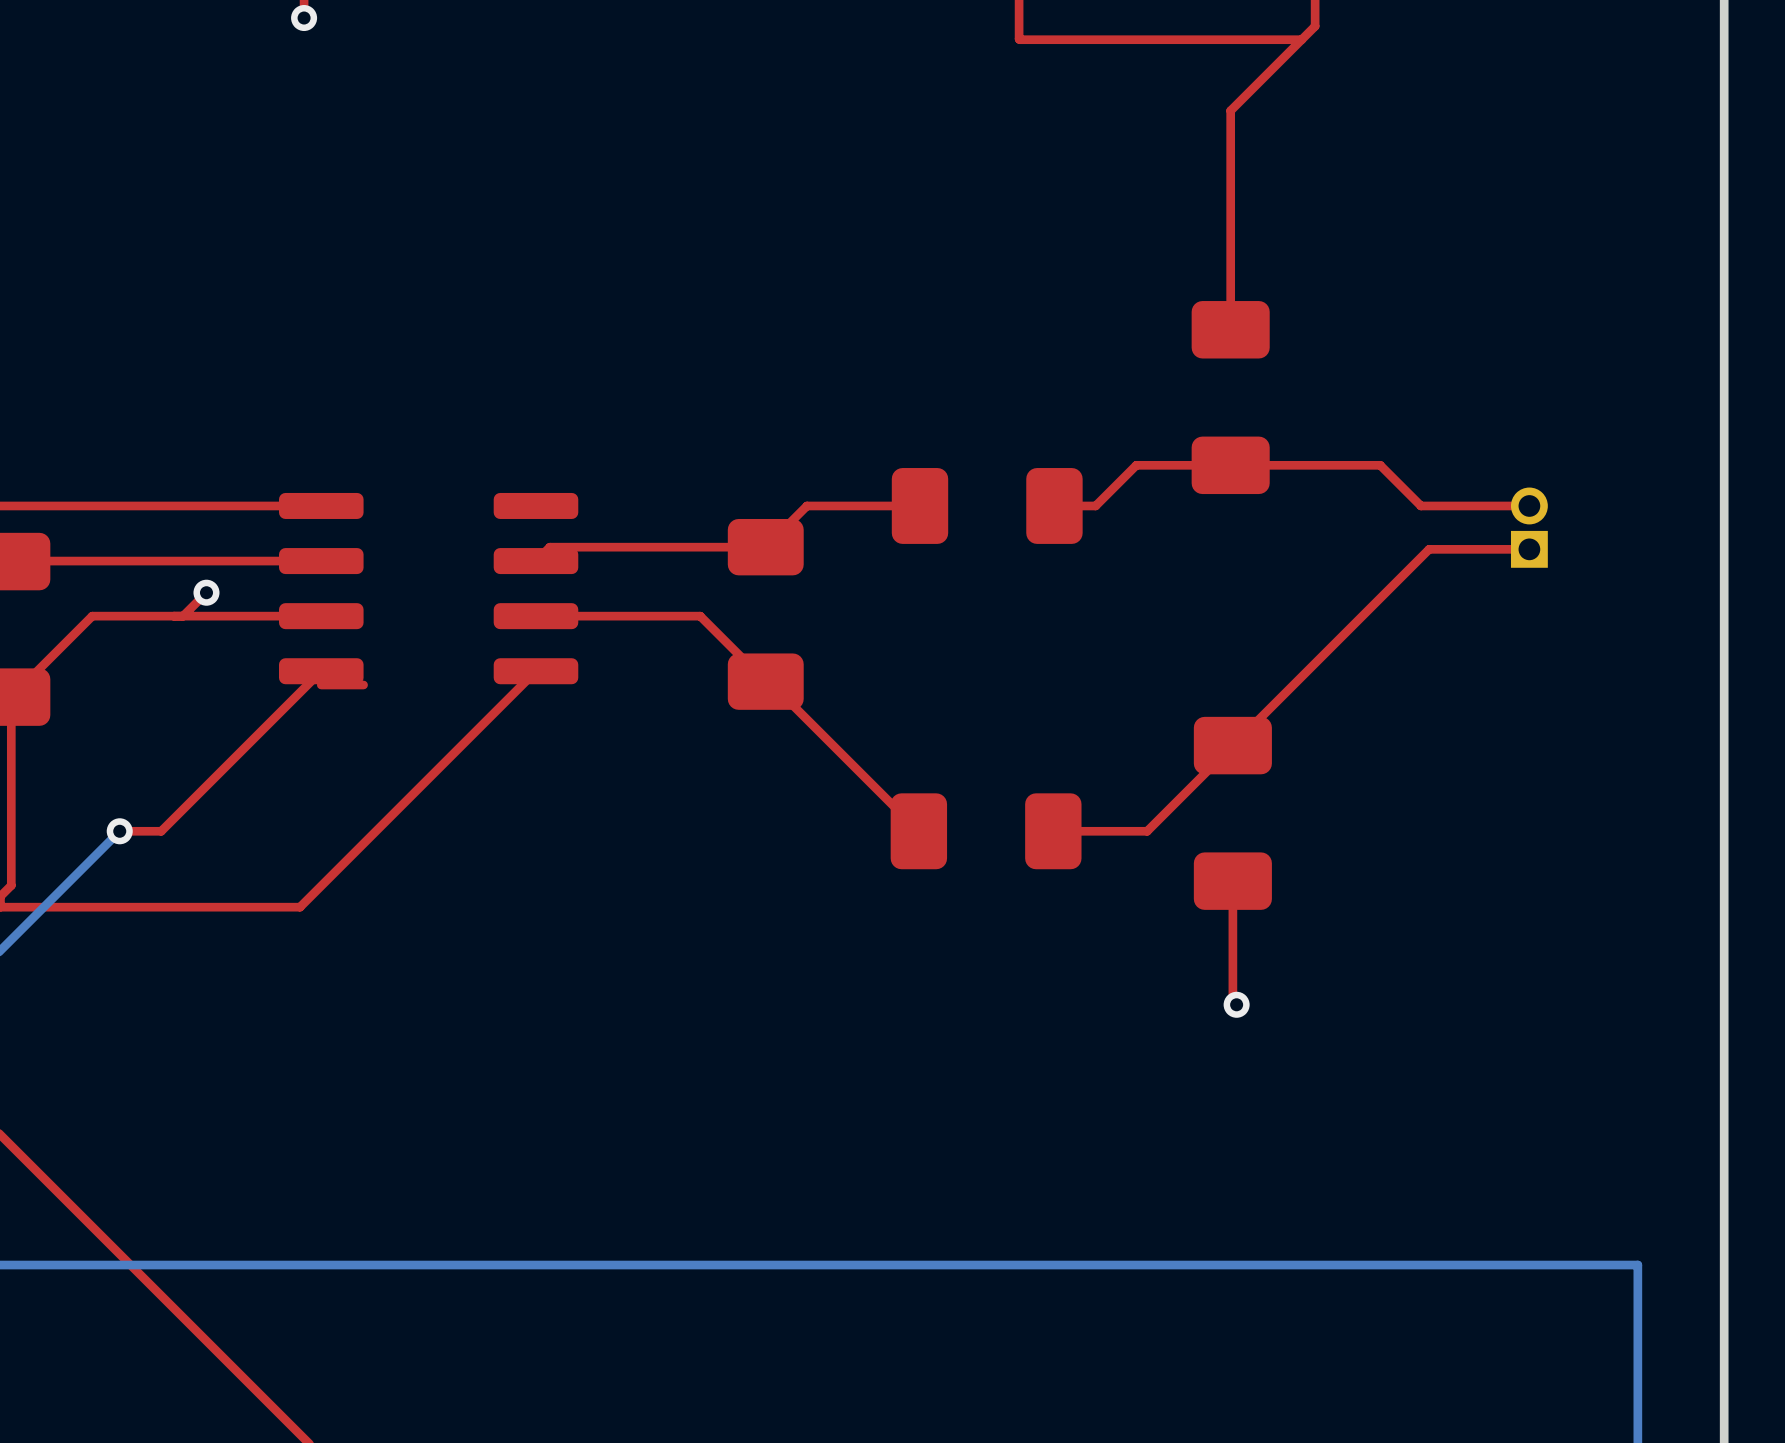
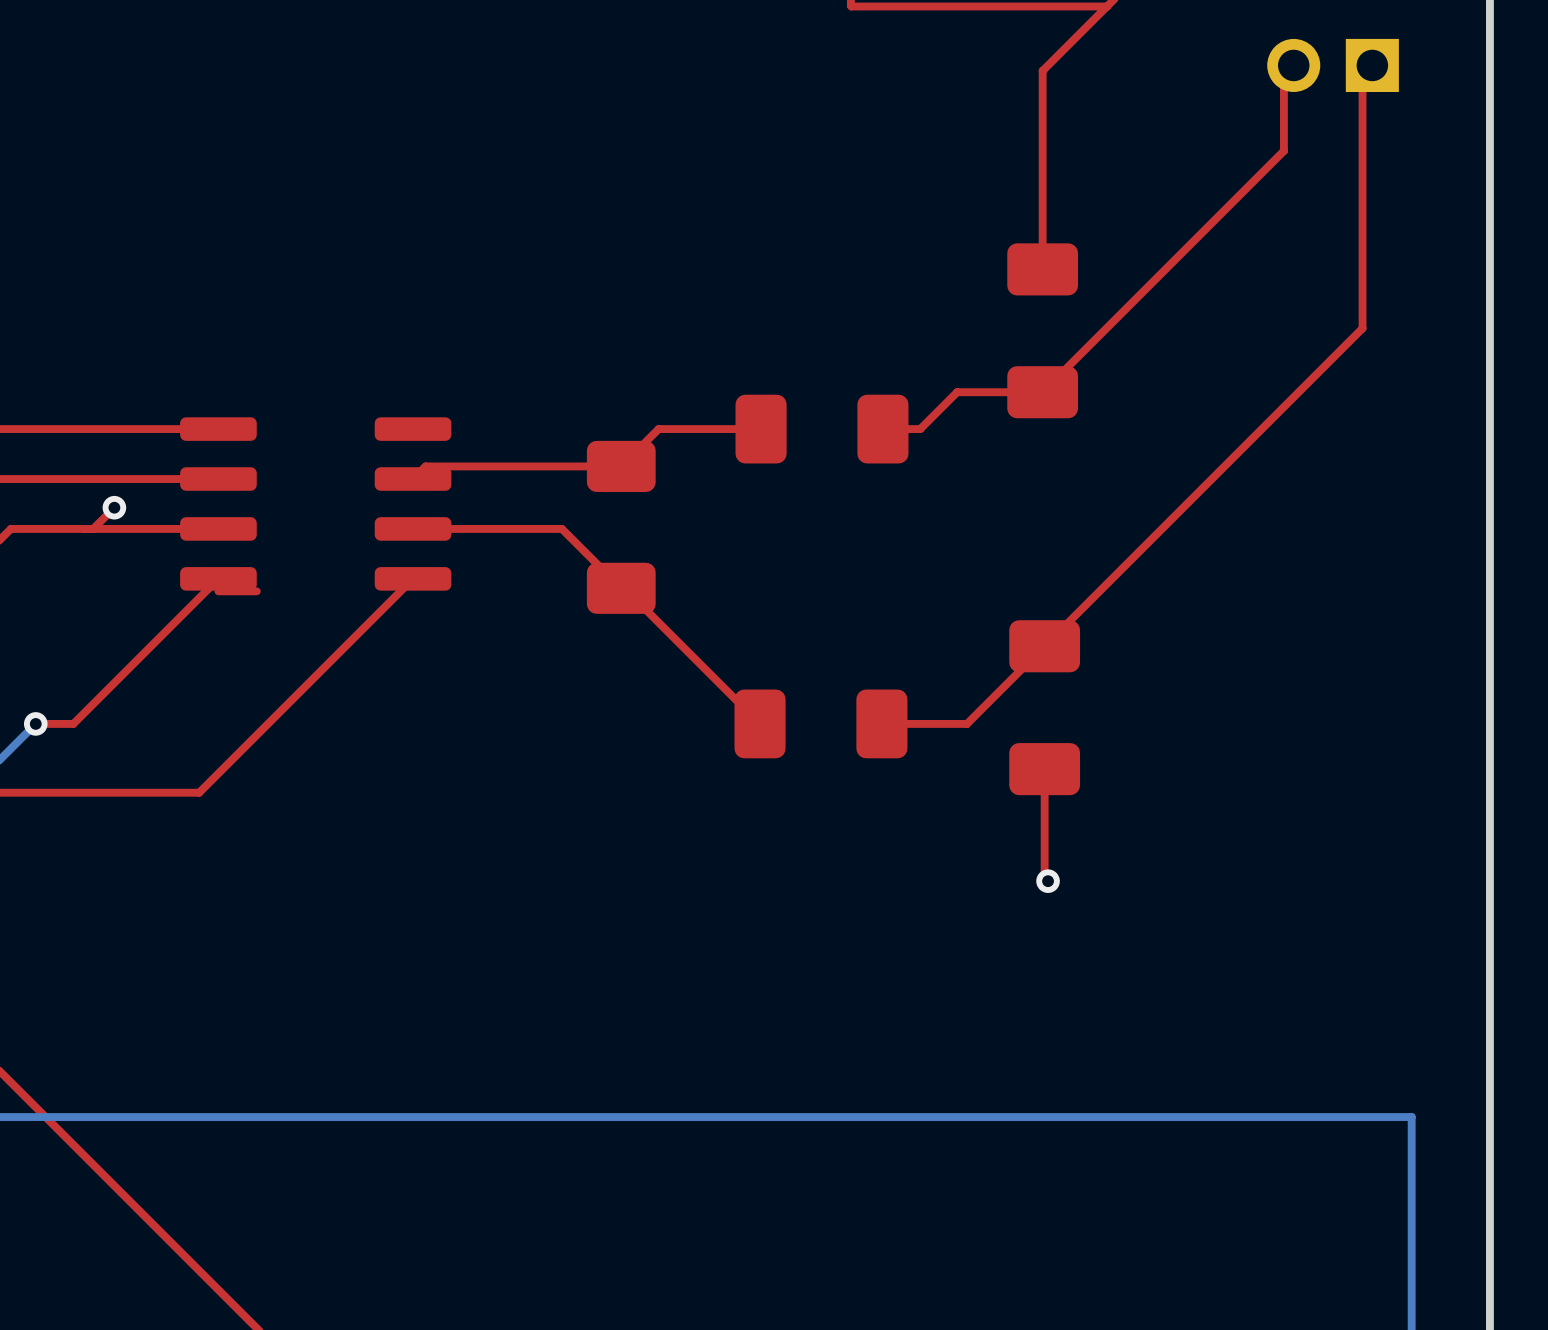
part: none -> (1333, 65)
top track: (1230, 465) (1380, 465) (1420, 505) (1529, 505) -> (1042, 392) (1283, 150) (1283, 75) (1293, 65)
part: (1529, 527) -> none
top track: (1529, 549) (1429, 549) -> (1372, 65) (1362, 75) (1362, 328) (1222, 468)

